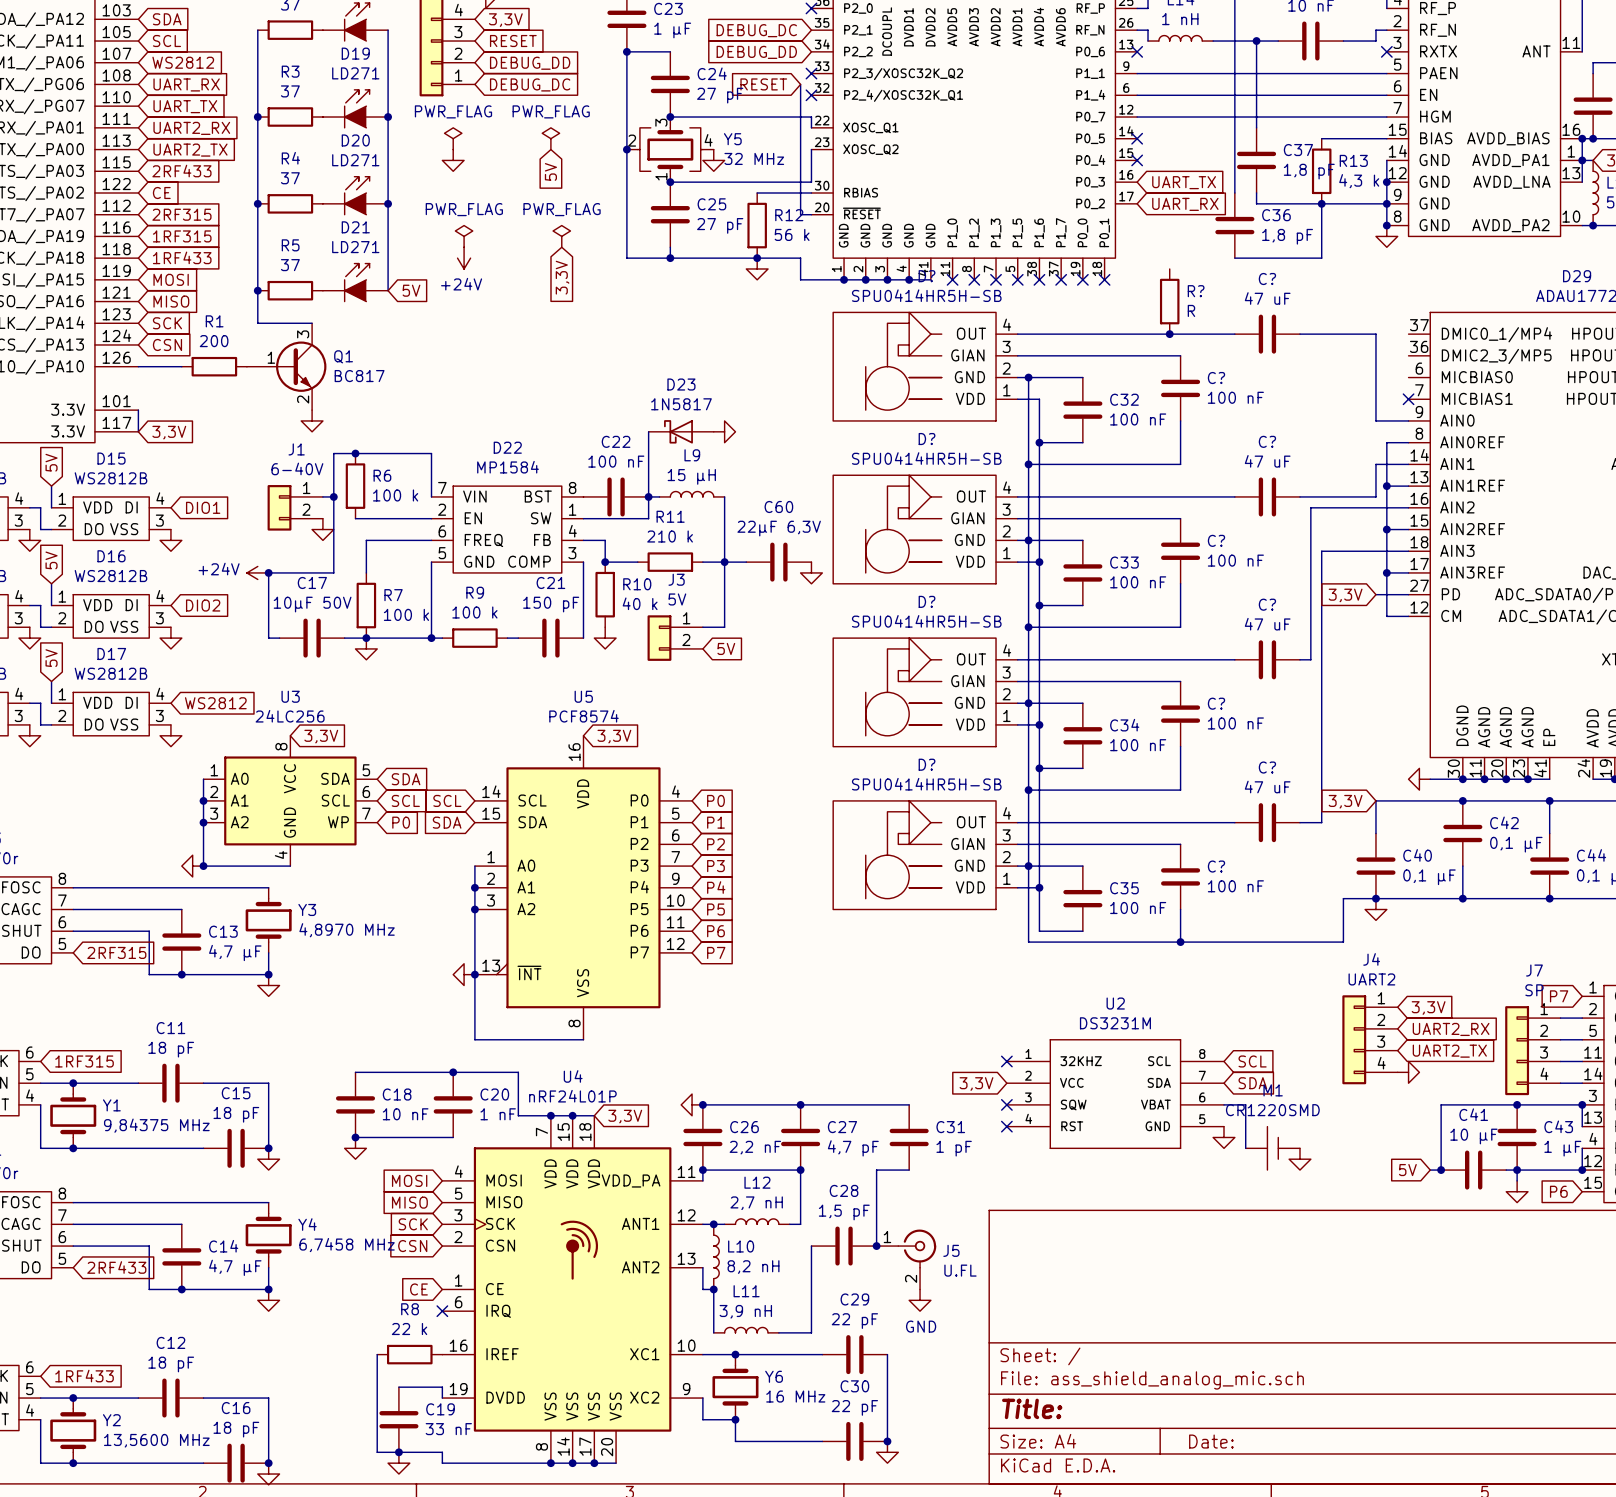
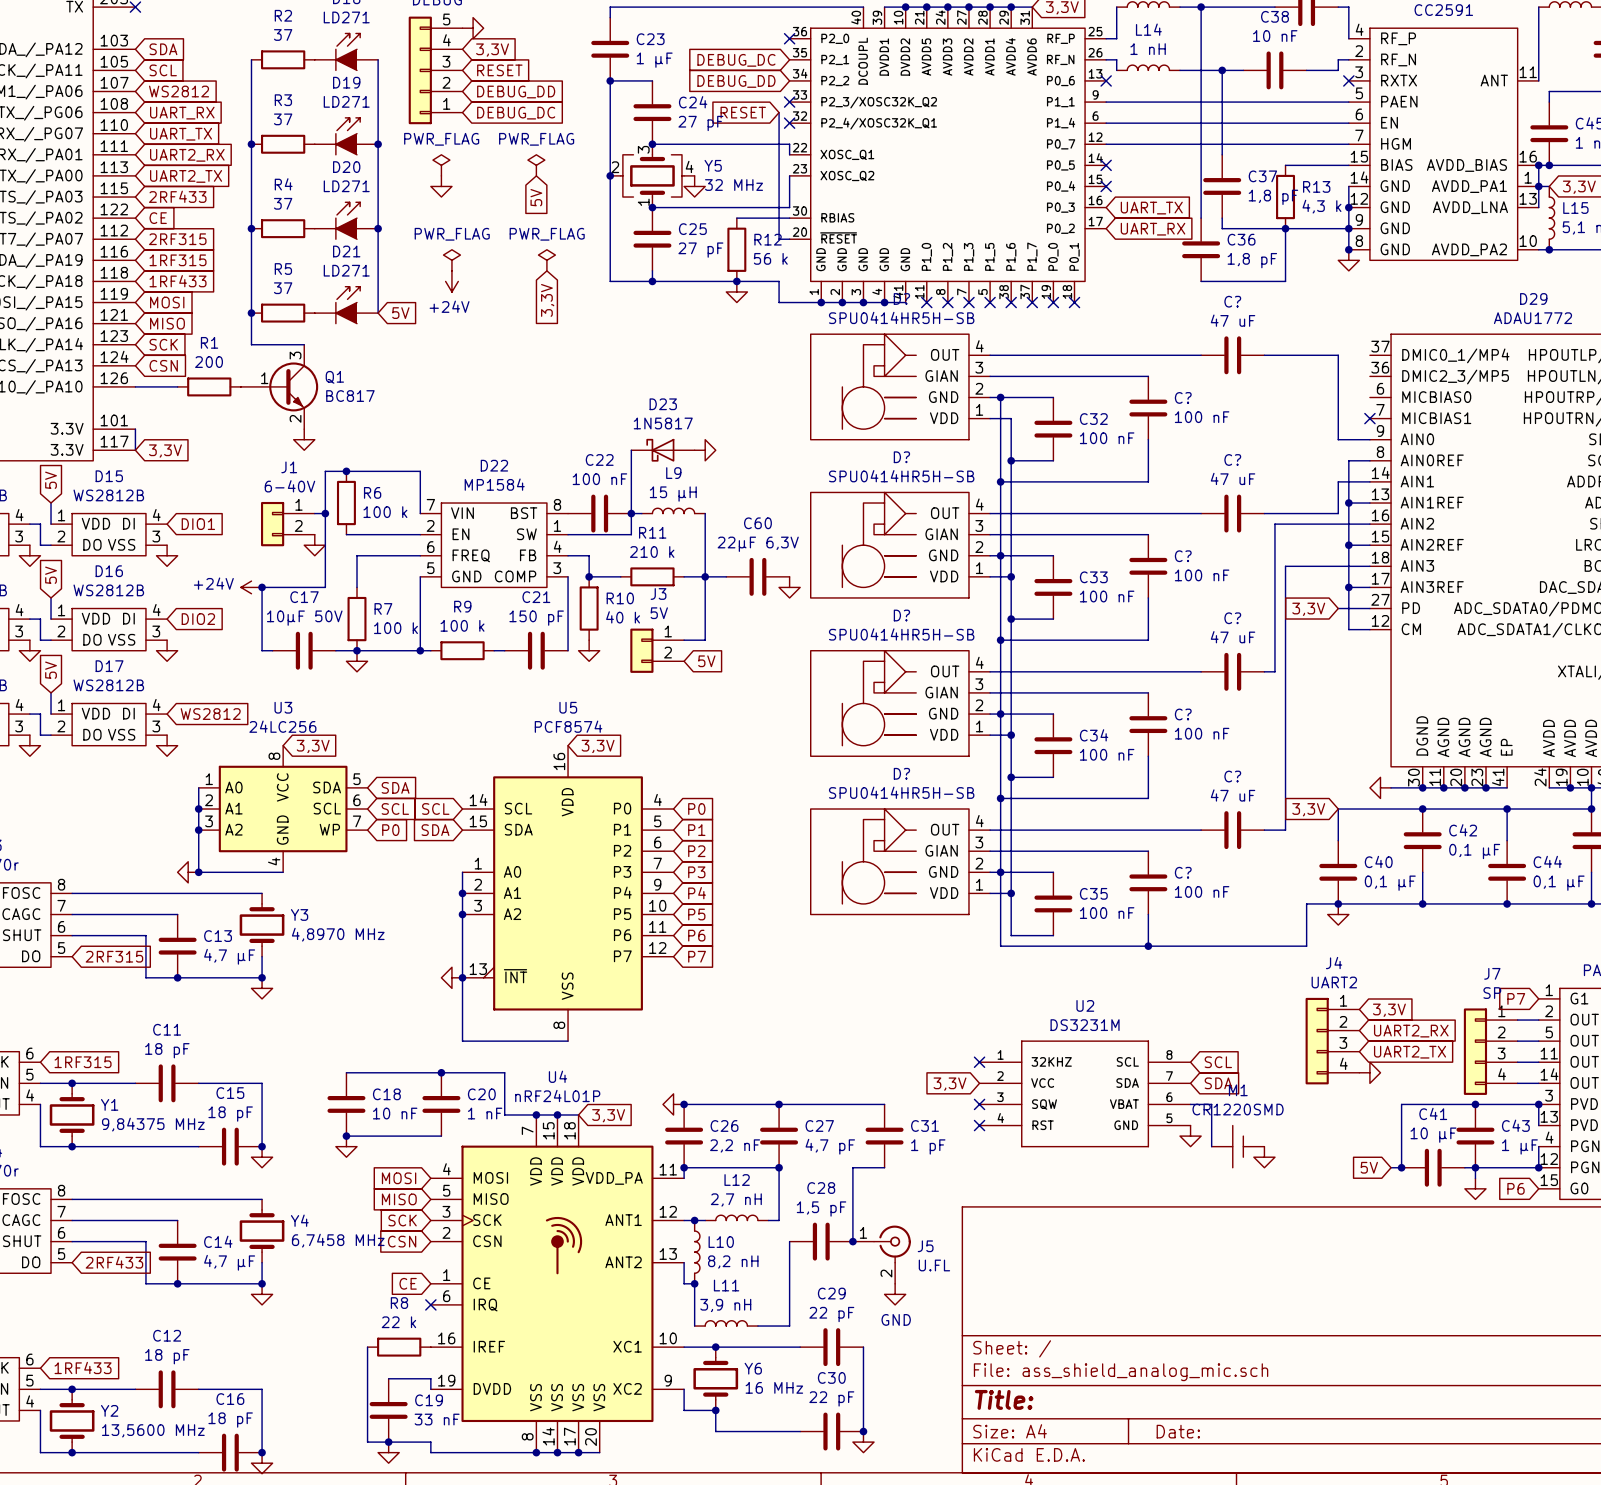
R?: R (1169, 301) -> none
junction: (1169, 334) -> none

